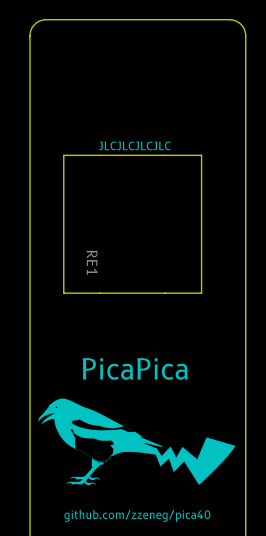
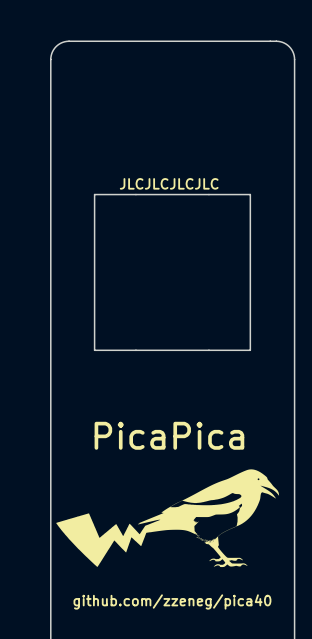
drawing: none -> [93, 193, 252, 352]
RE1: (132, 224) -> none
drawing shape: [38, 398, 236, 485] -> [56, 469, 280, 568]

